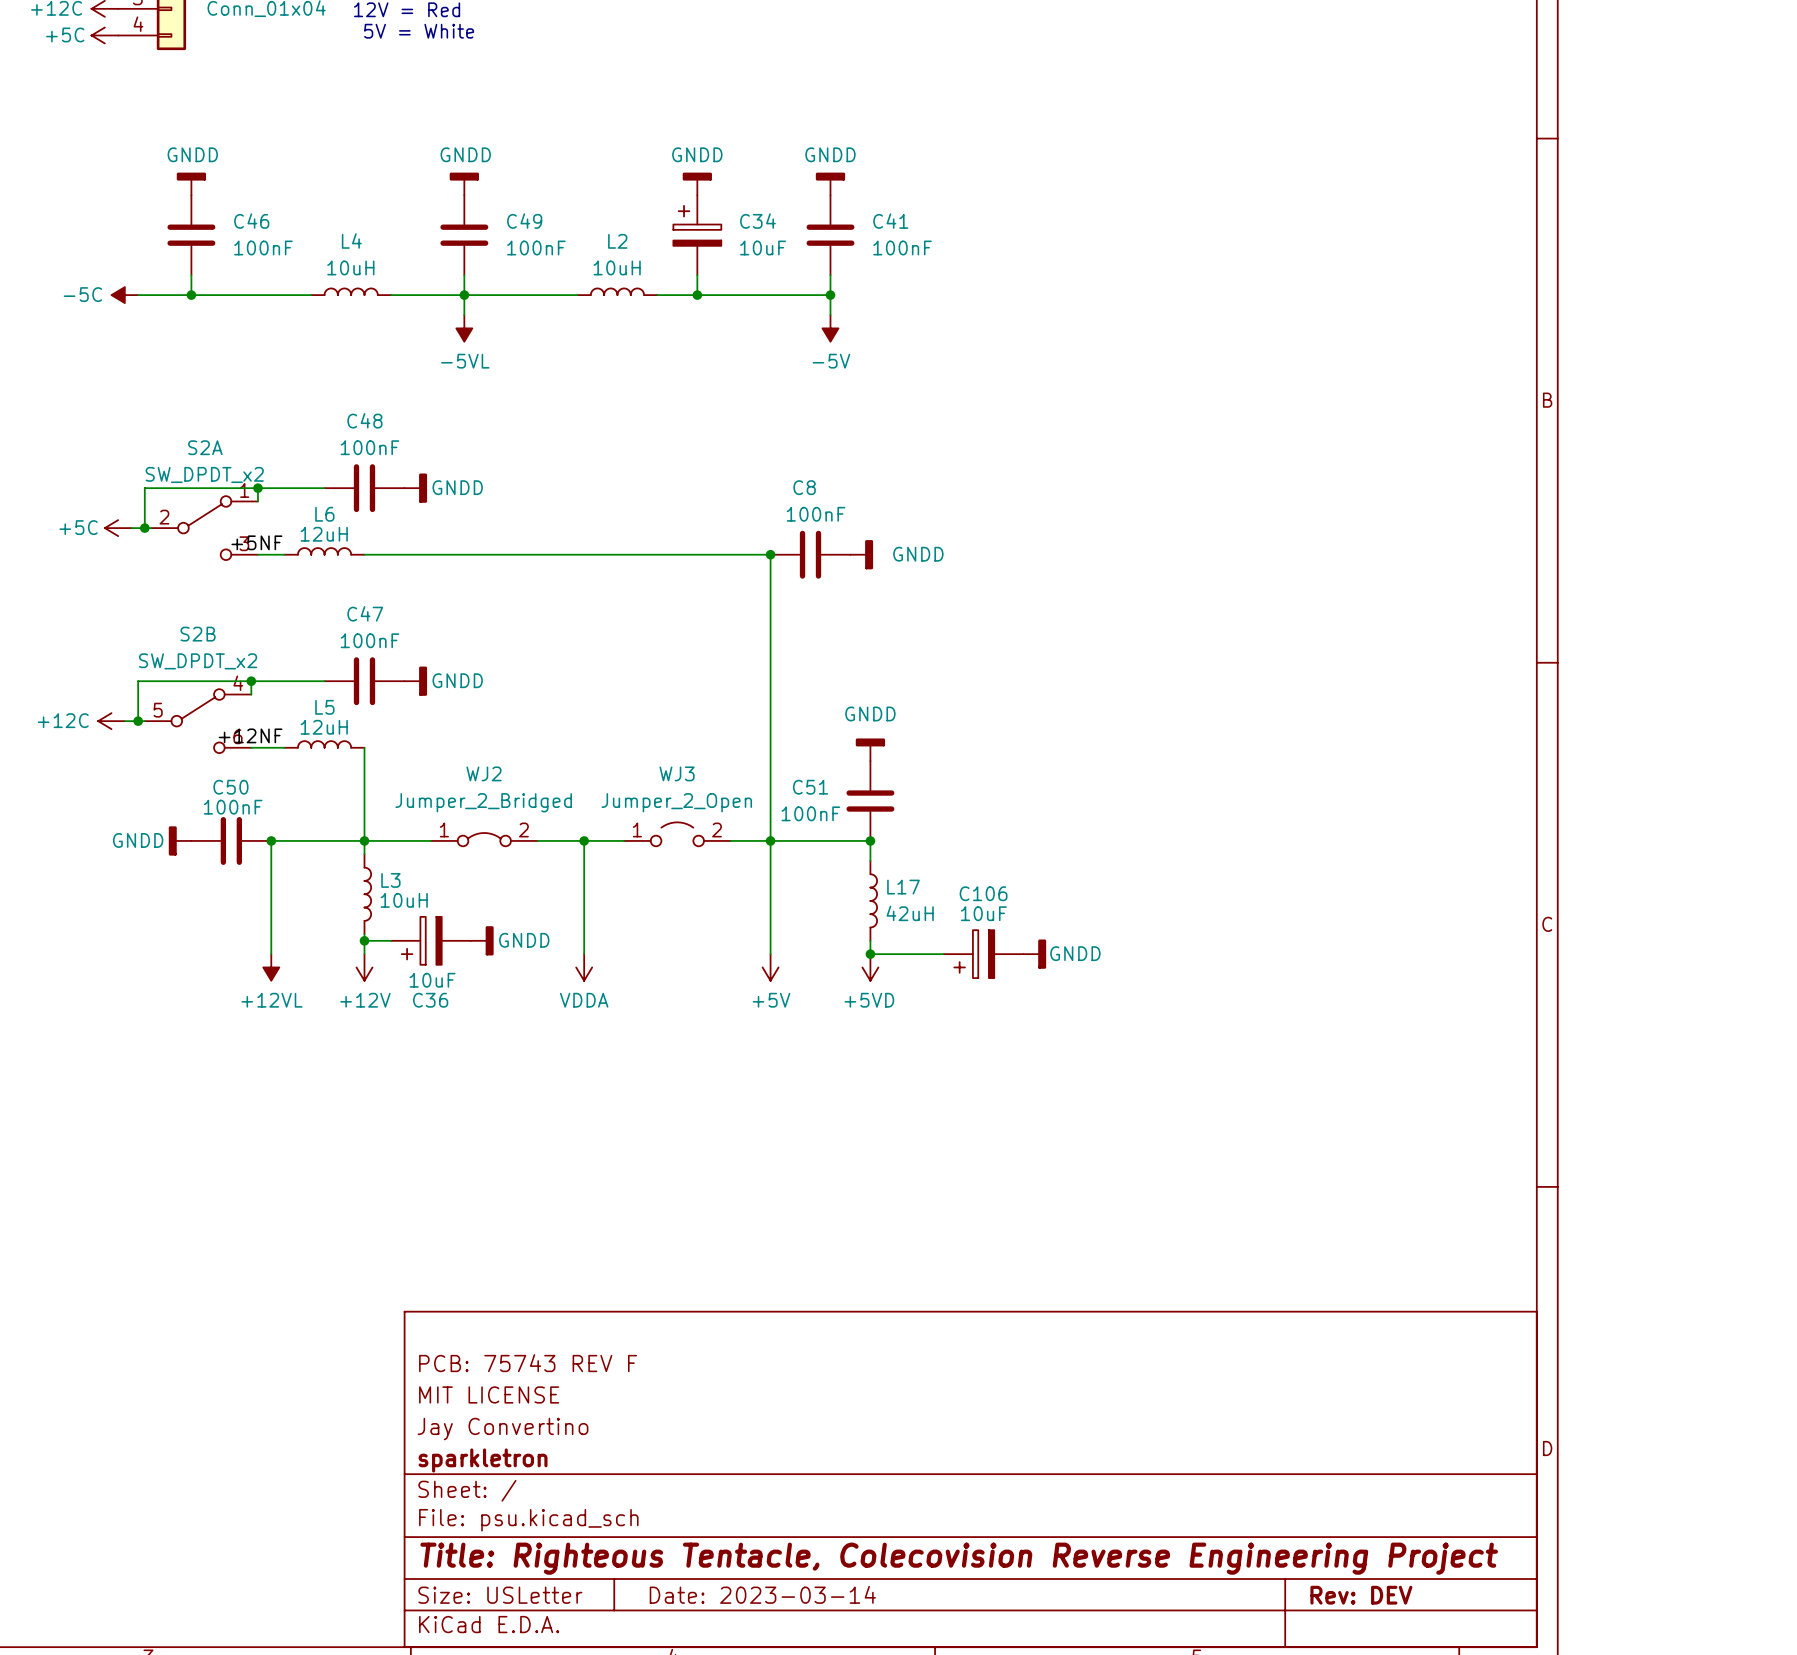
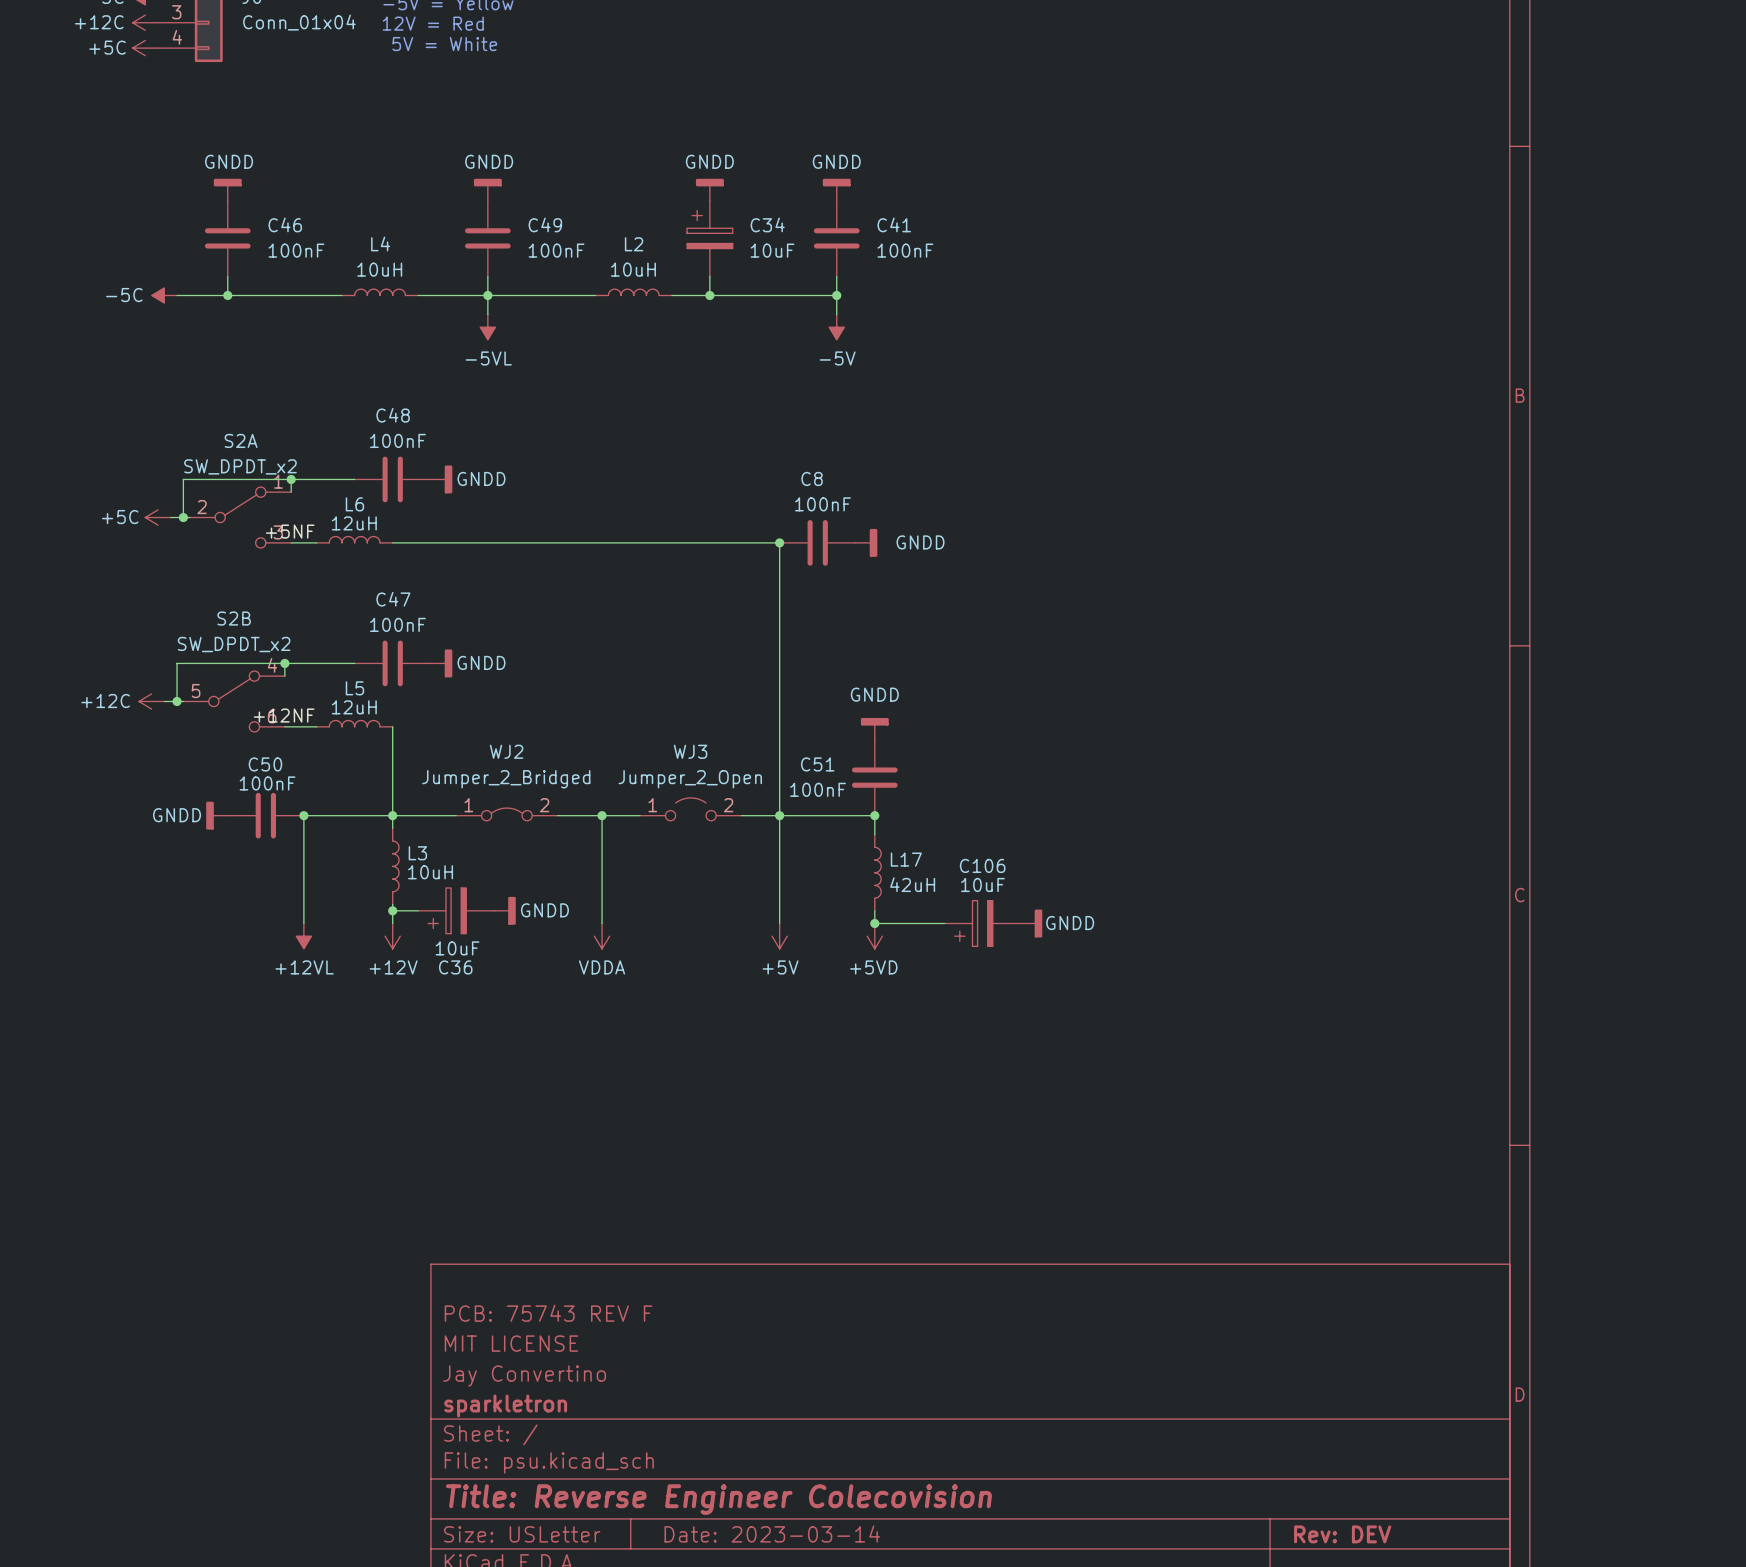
title block: Title: Righteous Tentacle, Colecovision Reverse Engineering Project (959, 1558) -> Title: Reverse Engineer Colecovision (718, 1499)

